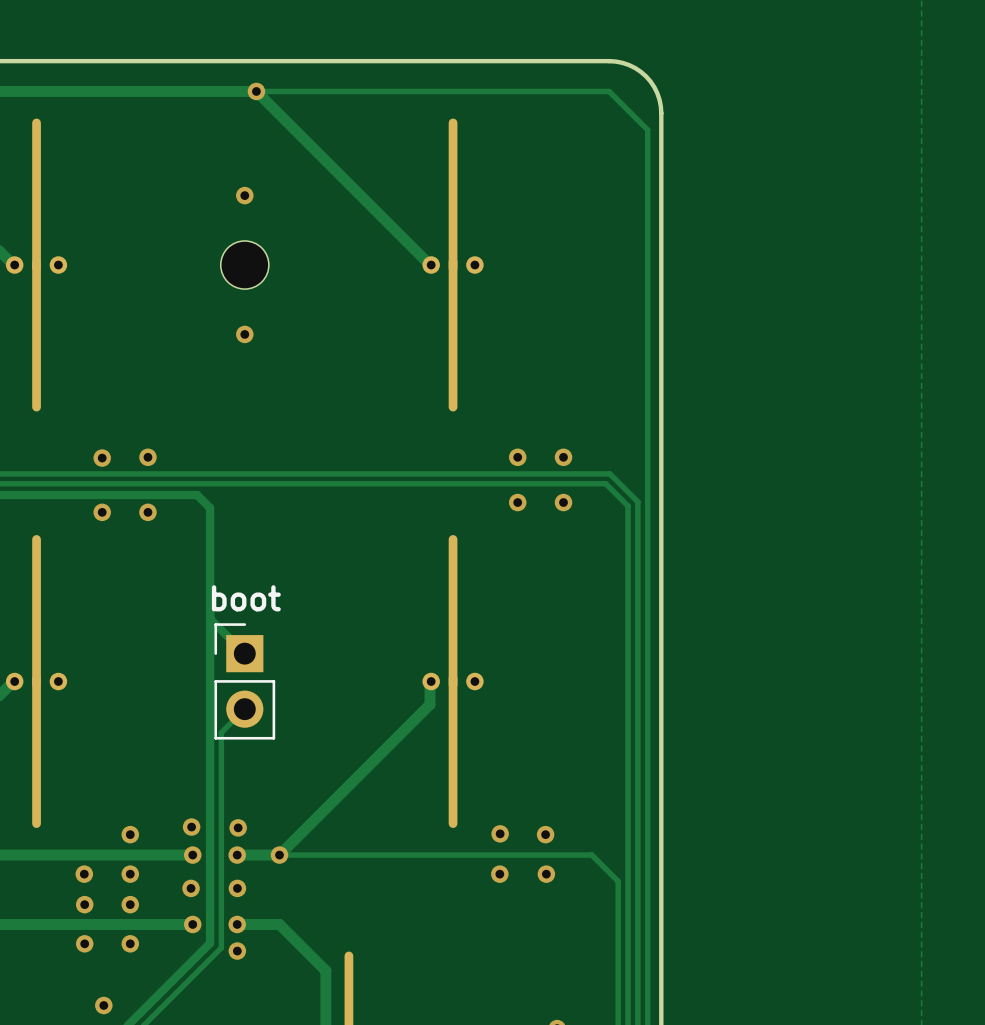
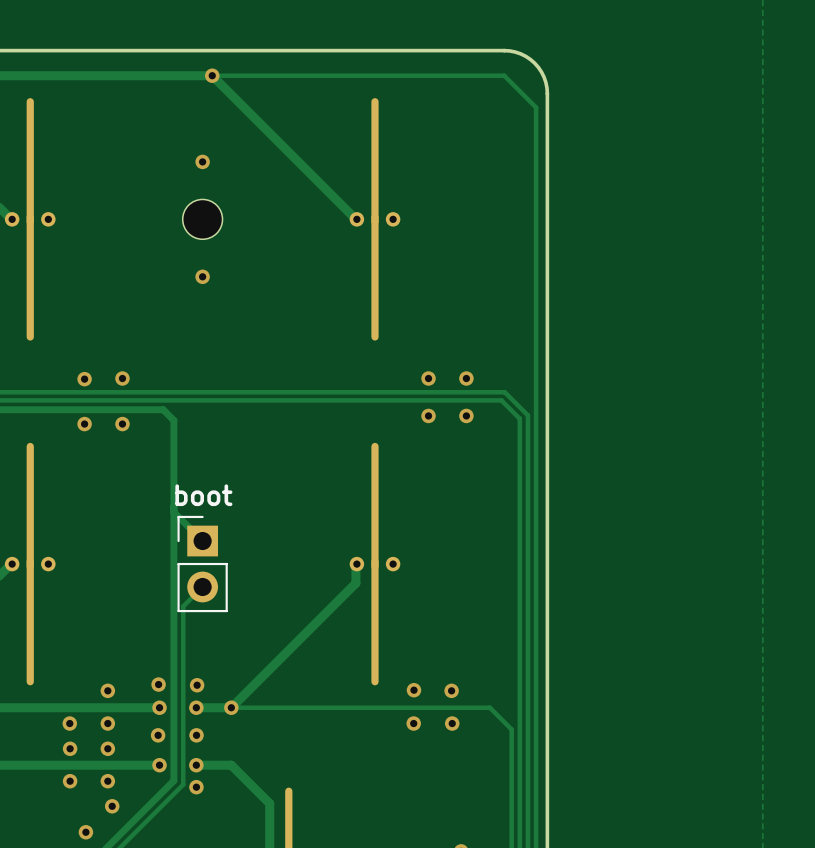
via: none -> (112, 806)

